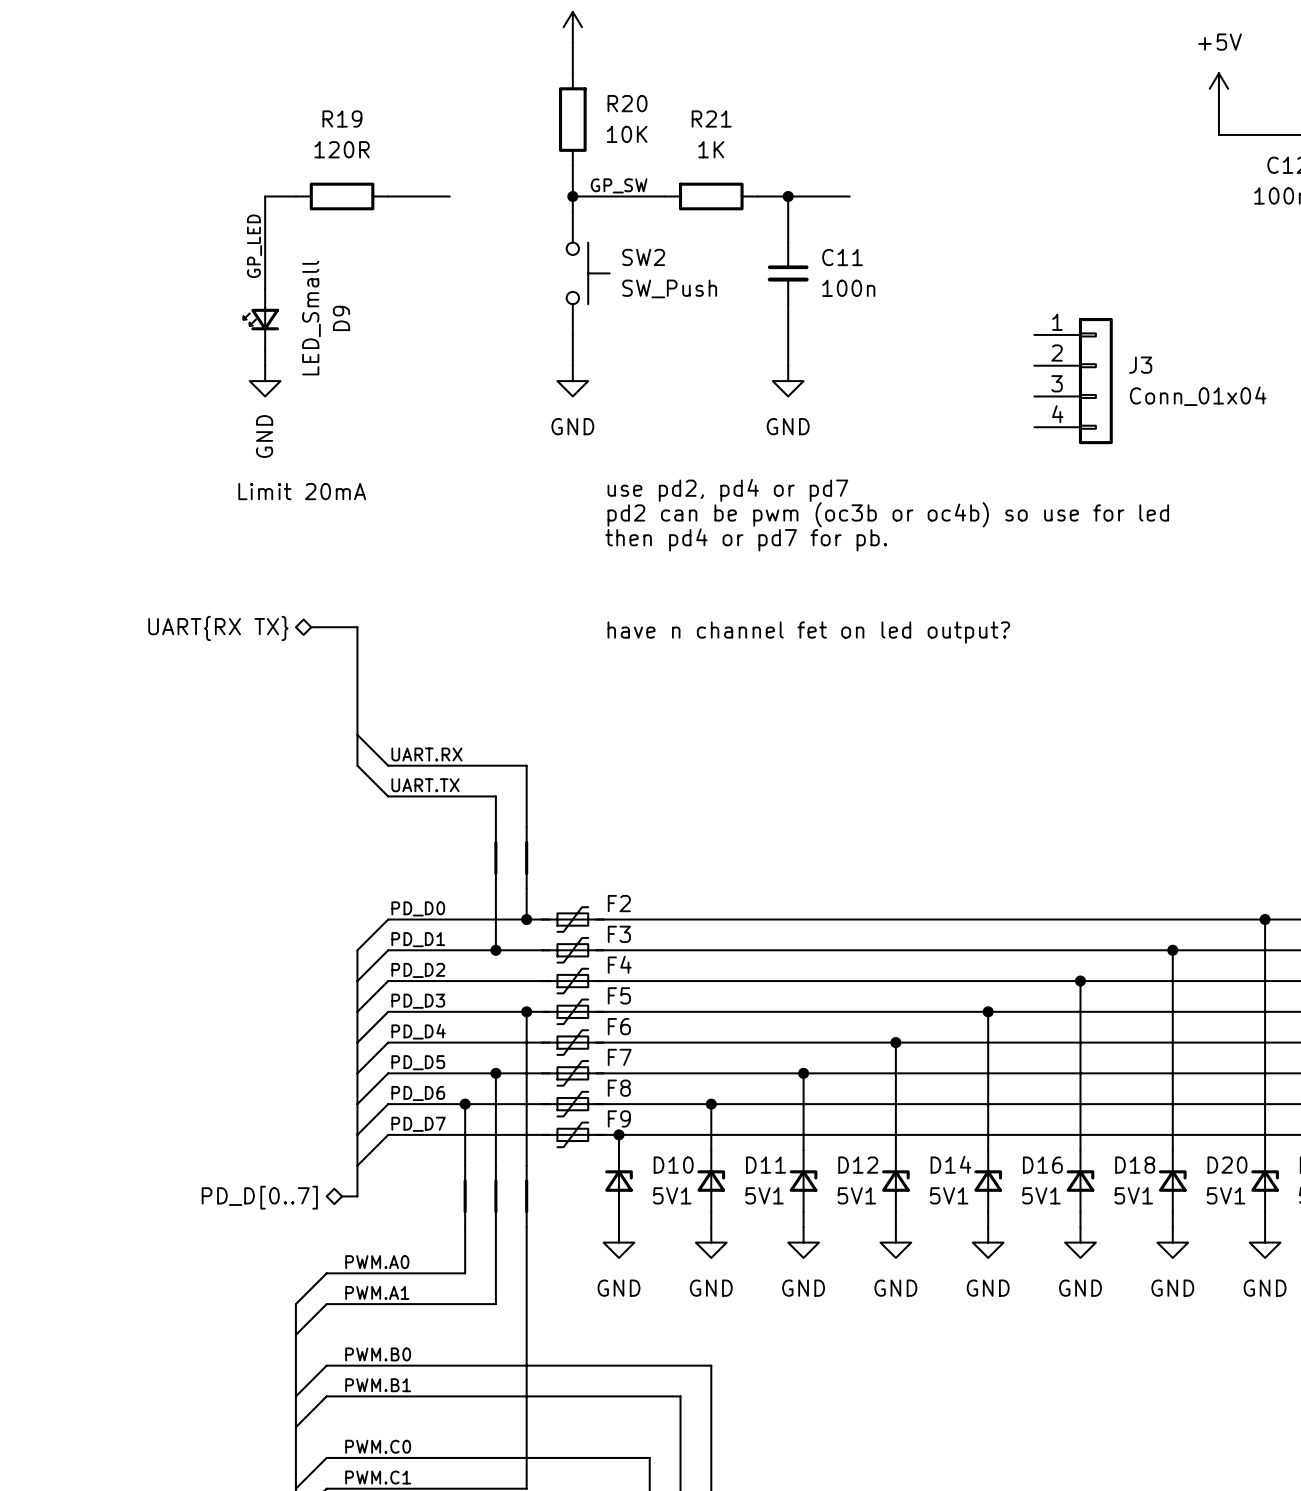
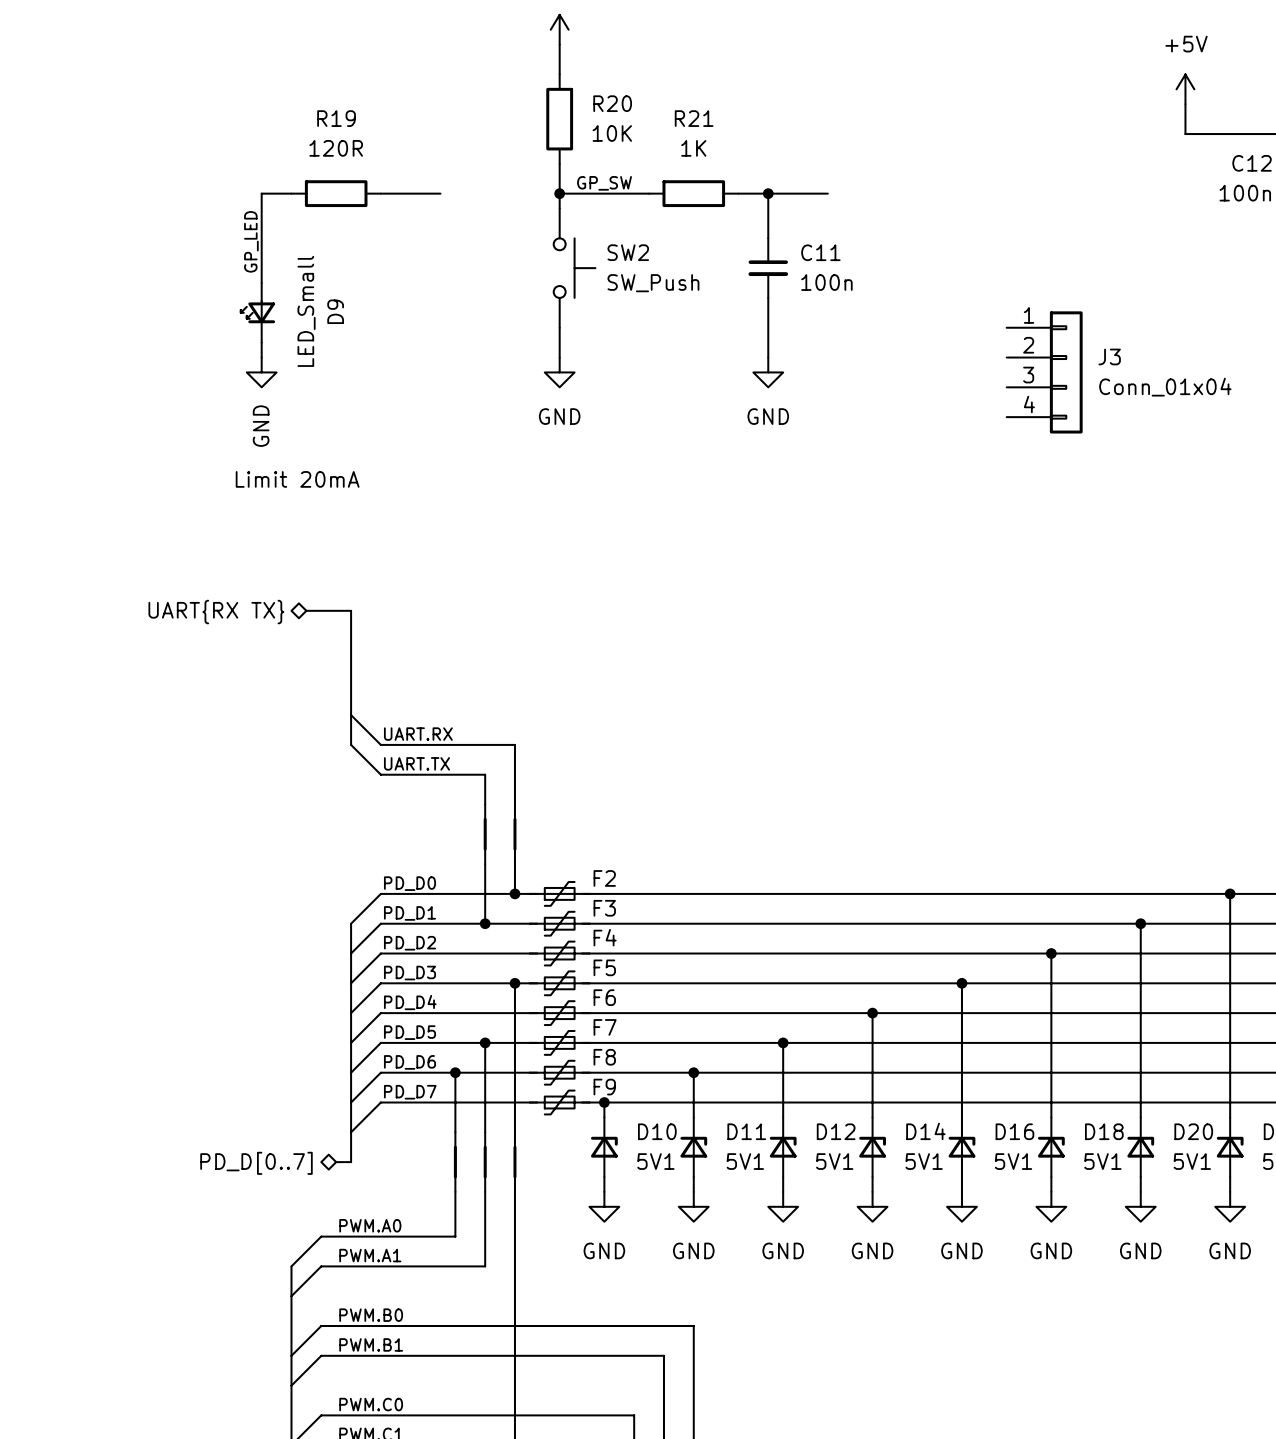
text: use pd2, pd4 or pd7 (727, 490) -> none
text: pd2 can be pwm (oc3b or oc4b) so use for led (888, 514) -> none
text: then pd4 or pd7 for pb. (746, 539) -> none
text: have n channel fet on led output? (808, 632) -> none

